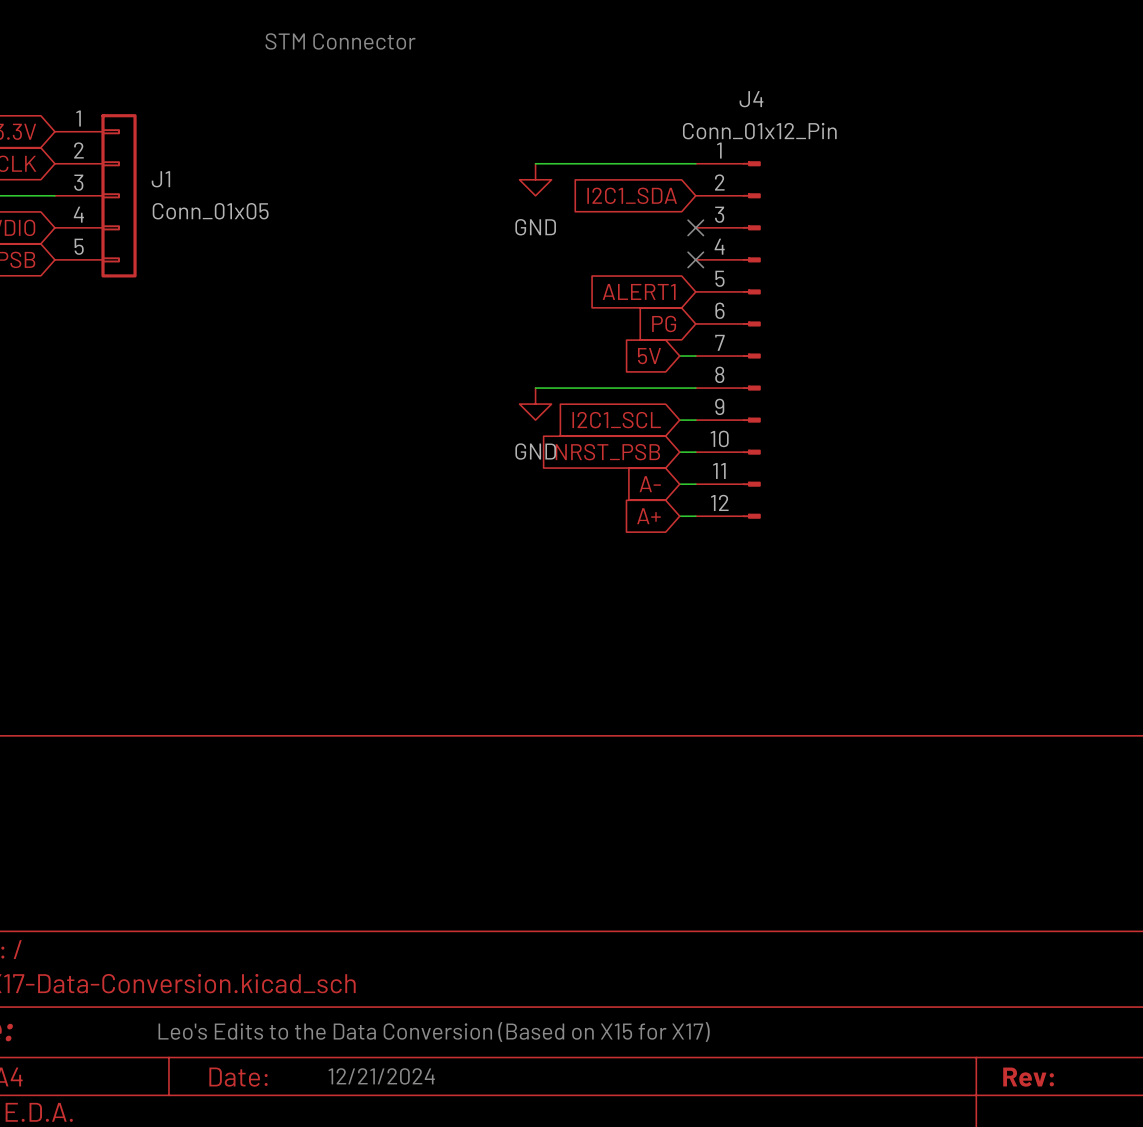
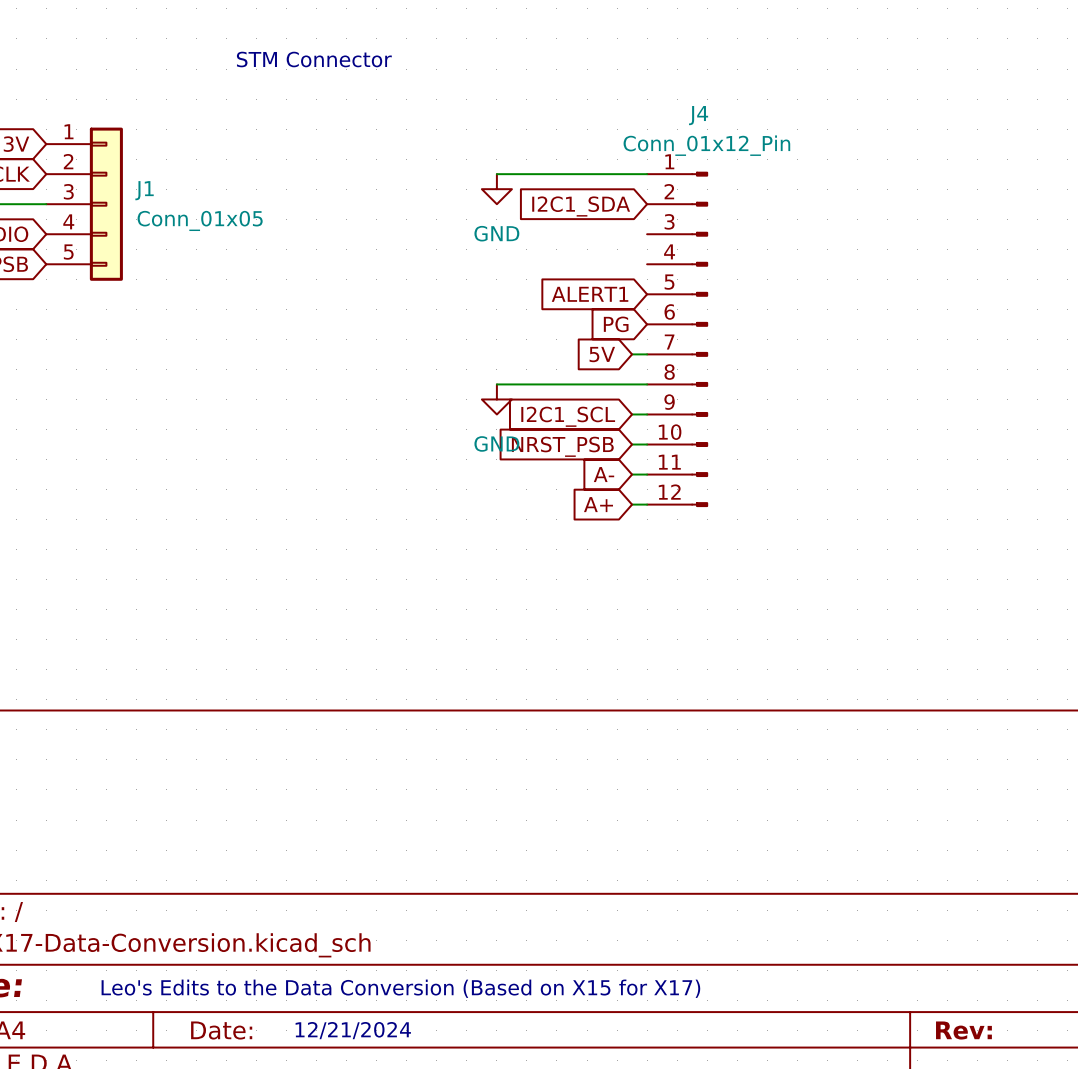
no-connect mark: (695, 227) -> none
no-connect mark: (695, 259) -> none

